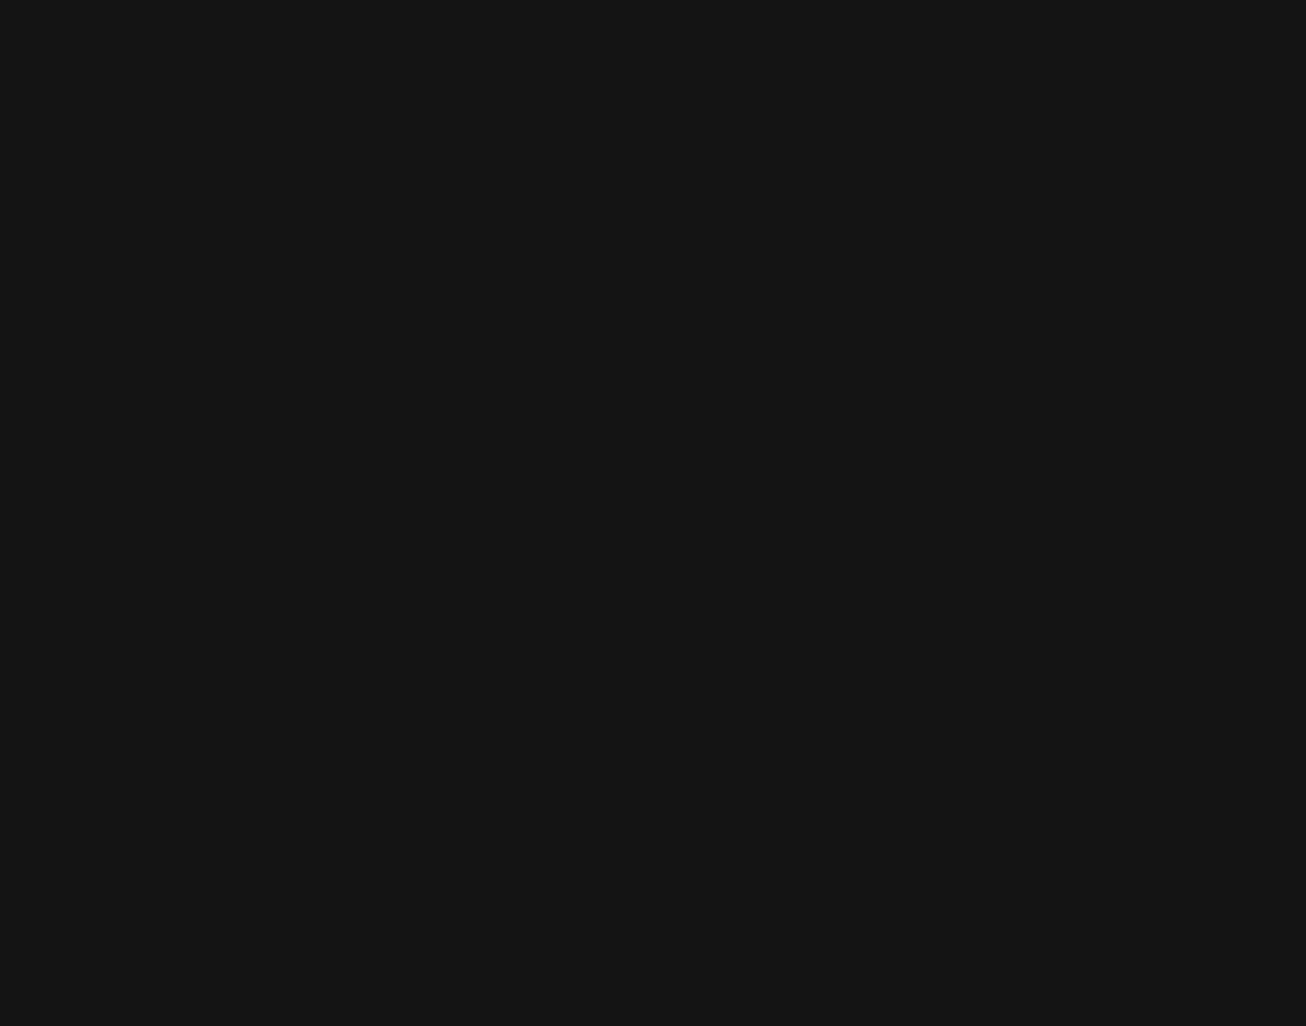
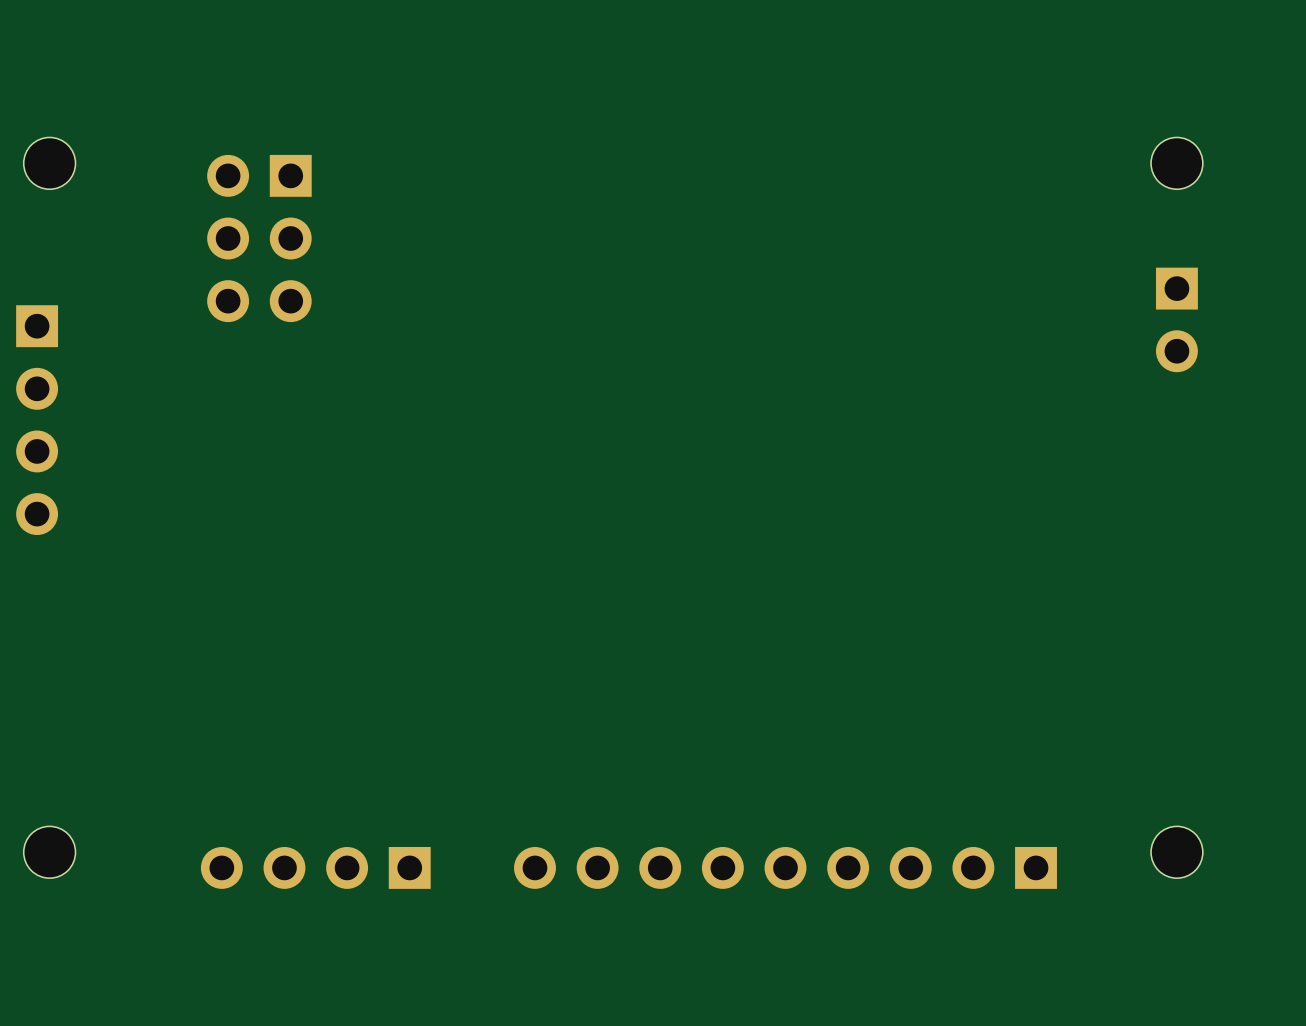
part: none -> (49, 163)
part: none -> (1176, 163)
part: none -> (259, 238)
part: none -> (1176, 319)
part: none -> (37, 420)
part: none -> (49, 852)
part: none -> (1176, 852)
part: none -> (315, 867)
part: none -> (785, 867)

